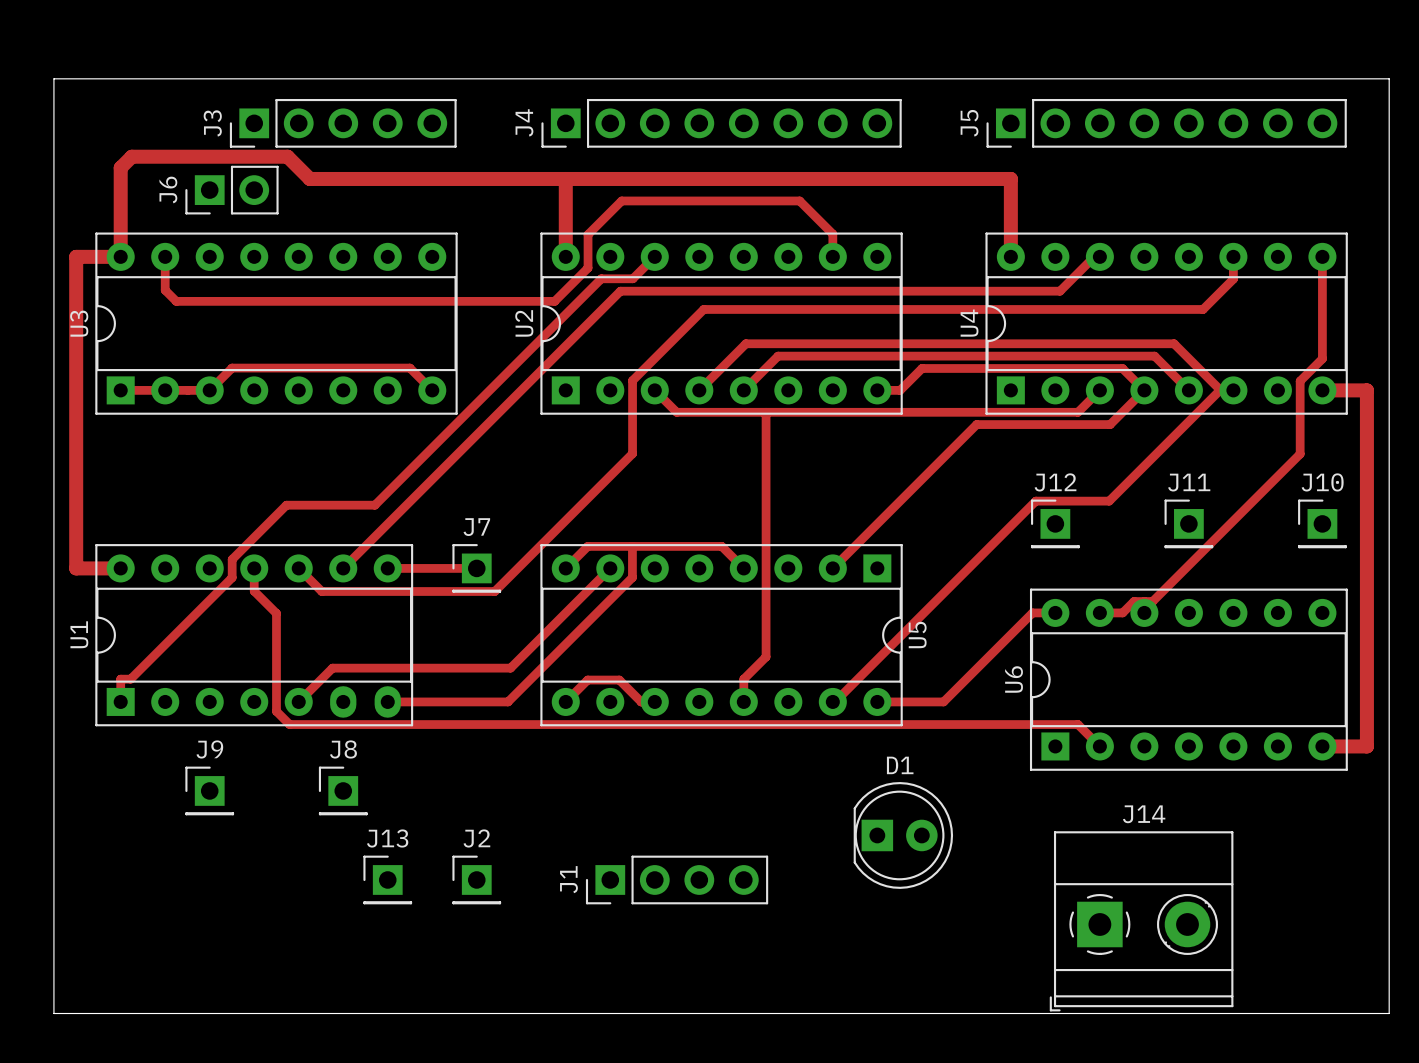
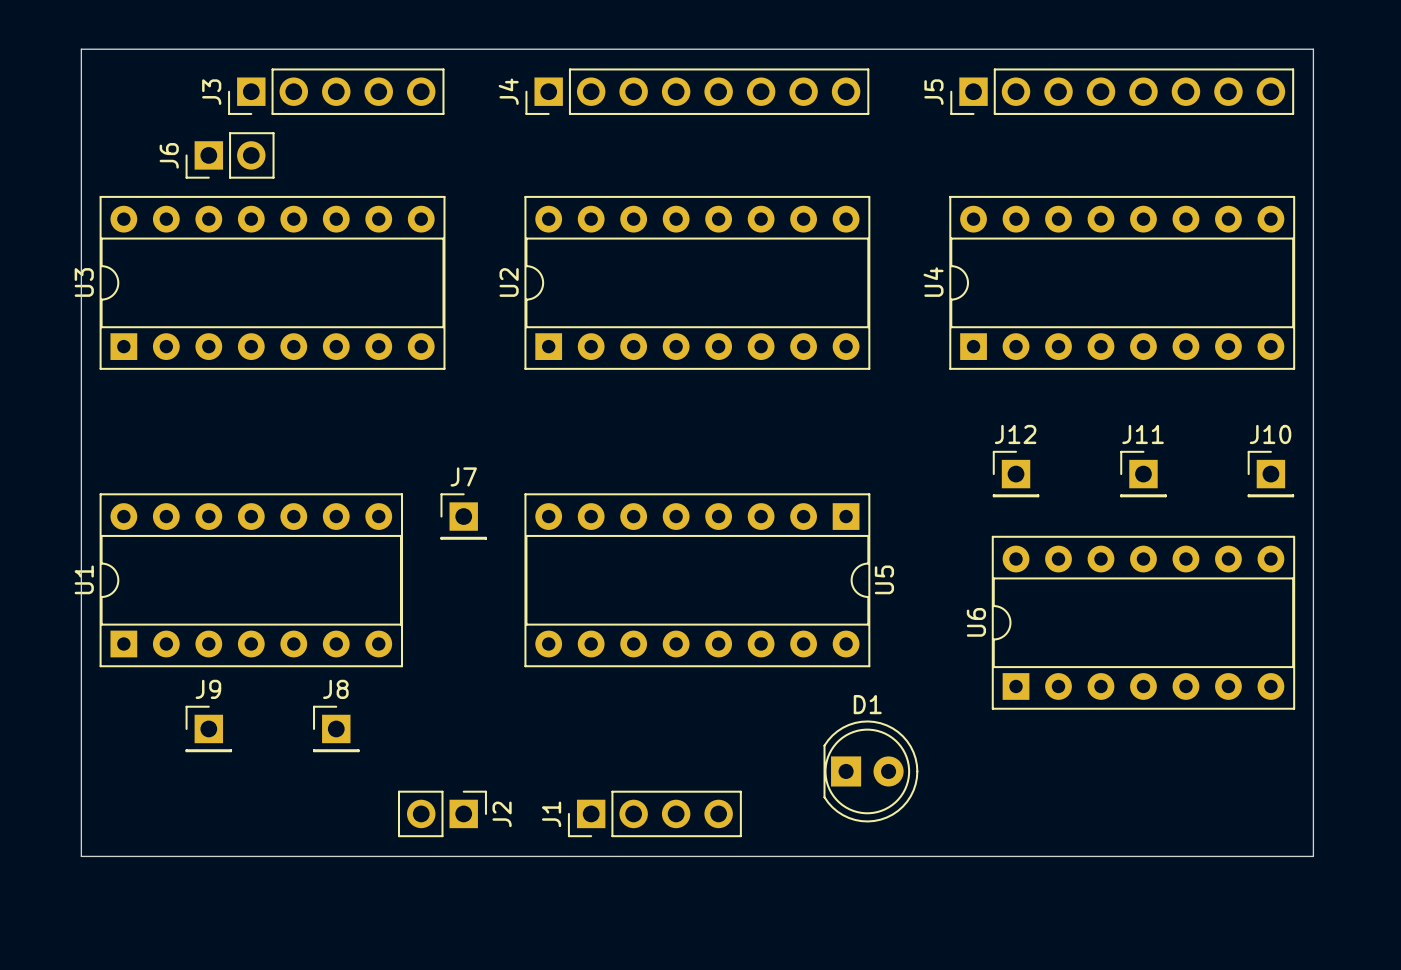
board edge: (76, 78) (53, 78) (53, 1013) (1389, 1013) (1389, 78) (1366, 78) -> (81, 49) (81, 856) (1313, 856) (1313, 49)
track: (565, 178) (565, 256) -> none
track: (165, 256) (165, 290) (176, 301) (554, 301) (588, 267) (588, 234) (621, 200) (799, 200) (832, 234) (832, 256) -> none
track: (654, 256) (632, 278) (601, 278) (374, 505) (286, 505) (232, 559) (232, 577) (130, 679) (120, 679) (120, 701) -> none
track: (1010, 256) (1010, 178) (309, 178) (287, 156) (131, 156) (120, 167) (120, 256) (76, 256) (76, 568) (120, 568) -> none
track: (1099, 256) (1094, 256) (1060, 291) (620, 291) (343, 568) -> none
track: (1233, 256) (1233, 279) (1203, 309) (703, 309) (632, 380) (632, 453) (494, 591) (321, 591) (298, 568) -> none
track: (1322, 256) (1322, 358) (1300, 381) (1300, 454) (1152, 601) (1134, 601) (1122, 612) (1099, 612) -> none
track: (120, 390) (209, 390) (232, 368) (409, 368) (432, 390) -> none
track: (654, 390) (676, 412) (1077, 412) (1099, 390) -> none
track: (743, 390) (778, 356) (1154, 356) (1188, 390) -> none
track: (877, 390) (900, 390) (922, 368) (1122, 368) (1144, 390) (1110, 424) (976, 424) (832, 568) -> none
track: (1220, 390) (1174, 343) (745, 343) (699, 390) -> none
track: (1220, 390) (1109, 501) (1035, 501) (835, 701) (832, 701) -> none
track: (1322, 390) (1366, 390) (1366, 746) (1322, 746) -> none
track: (766, 412) (766, 656) (743, 679) (743, 701) -> none
U1 footprint: [95, 544, 414, 727] -> [99, 493, 404, 668]
track: (632, 546) (632, 577) (508, 701) (387, 701) -> none
track: (254, 568) (254, 591) (276, 613) (276, 711) (289, 724) (1077, 724) (1099, 746) -> none
track: (387, 568) (476, 568) -> none
track: (565, 568) (587, 546) (721, 546) (743, 568) -> none
track: (610, 568) (510, 668) (332, 668) (298, 701) -> none
track: (1055, 612) (1032, 612) (943, 701) (877, 701) -> none
track: (565, 701) (587, 680) (619, 680) (641, 701) (654, 701) -> none
J2 name position: J2 (476, 838) -> J2 (502, 814)
J2 footprint: [452, 855, 502, 905] -> [397, 790, 487, 838]
J13: (387, 879) -> none
J14: (1141, 921) -> none

